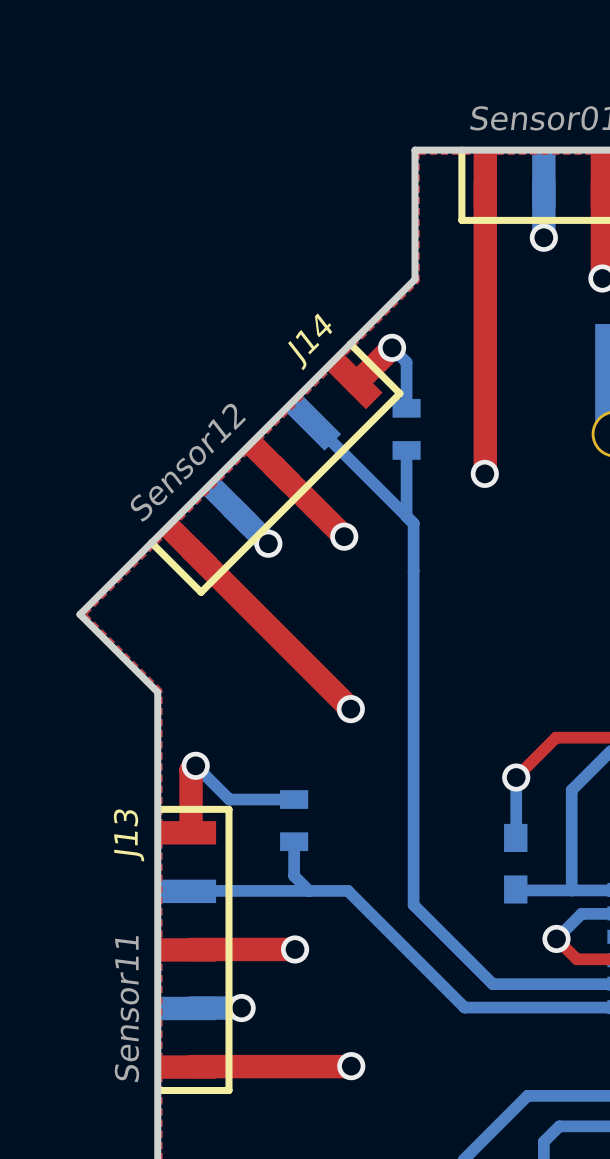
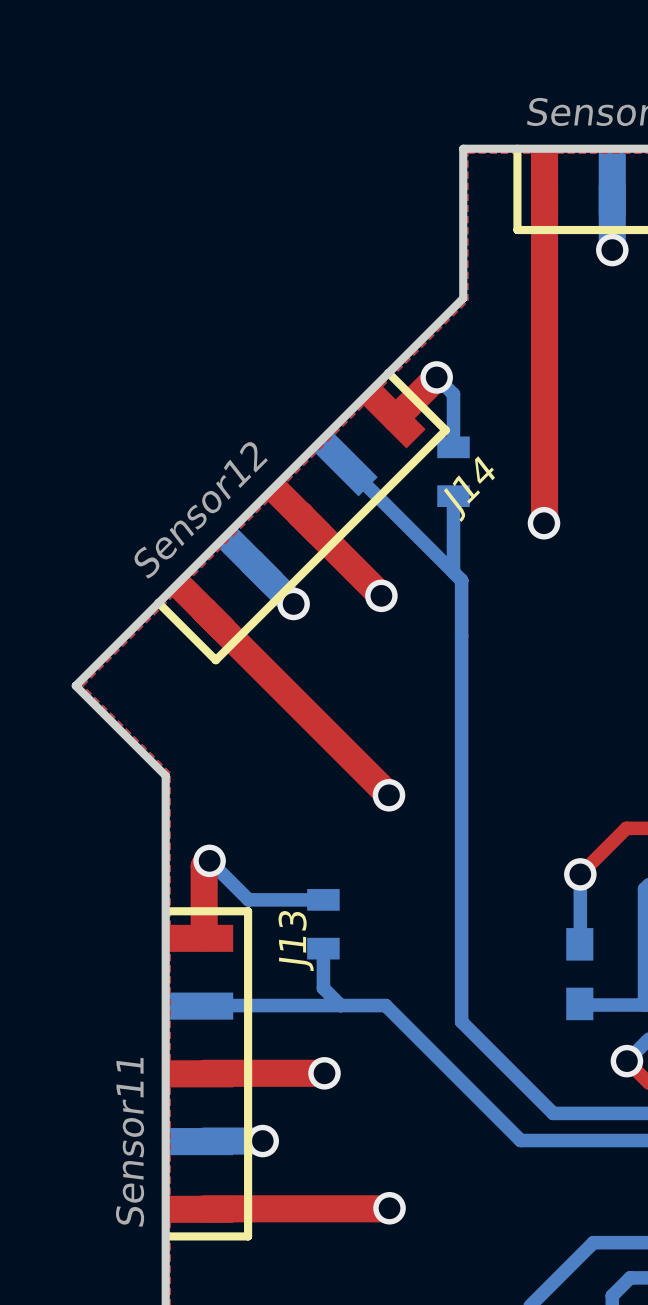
J14 name position: J14 (310, 341) -> J14 (469, 489)
J13 name position: J13 (128, 835) -> J13 (296, 940)

